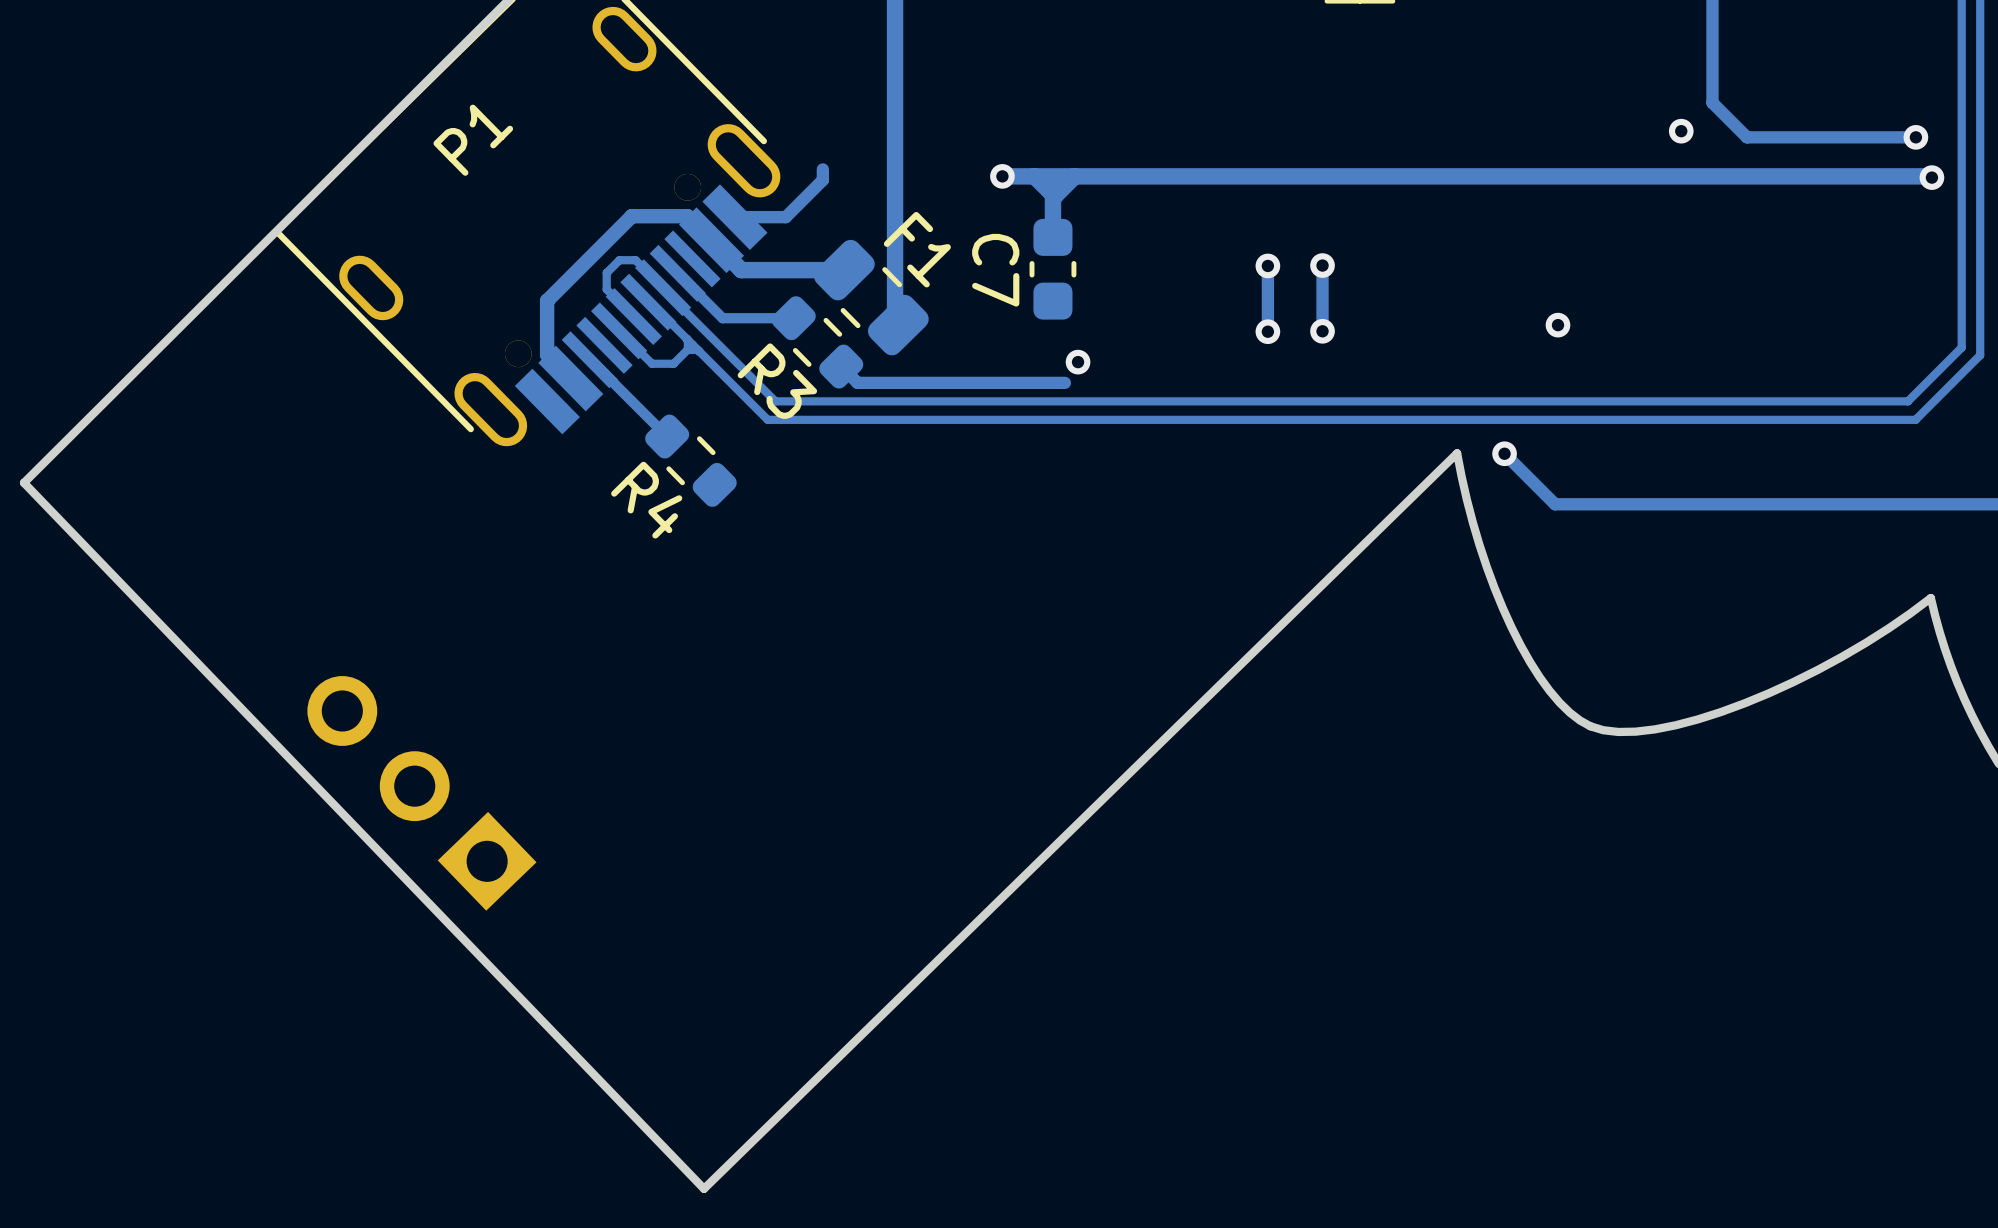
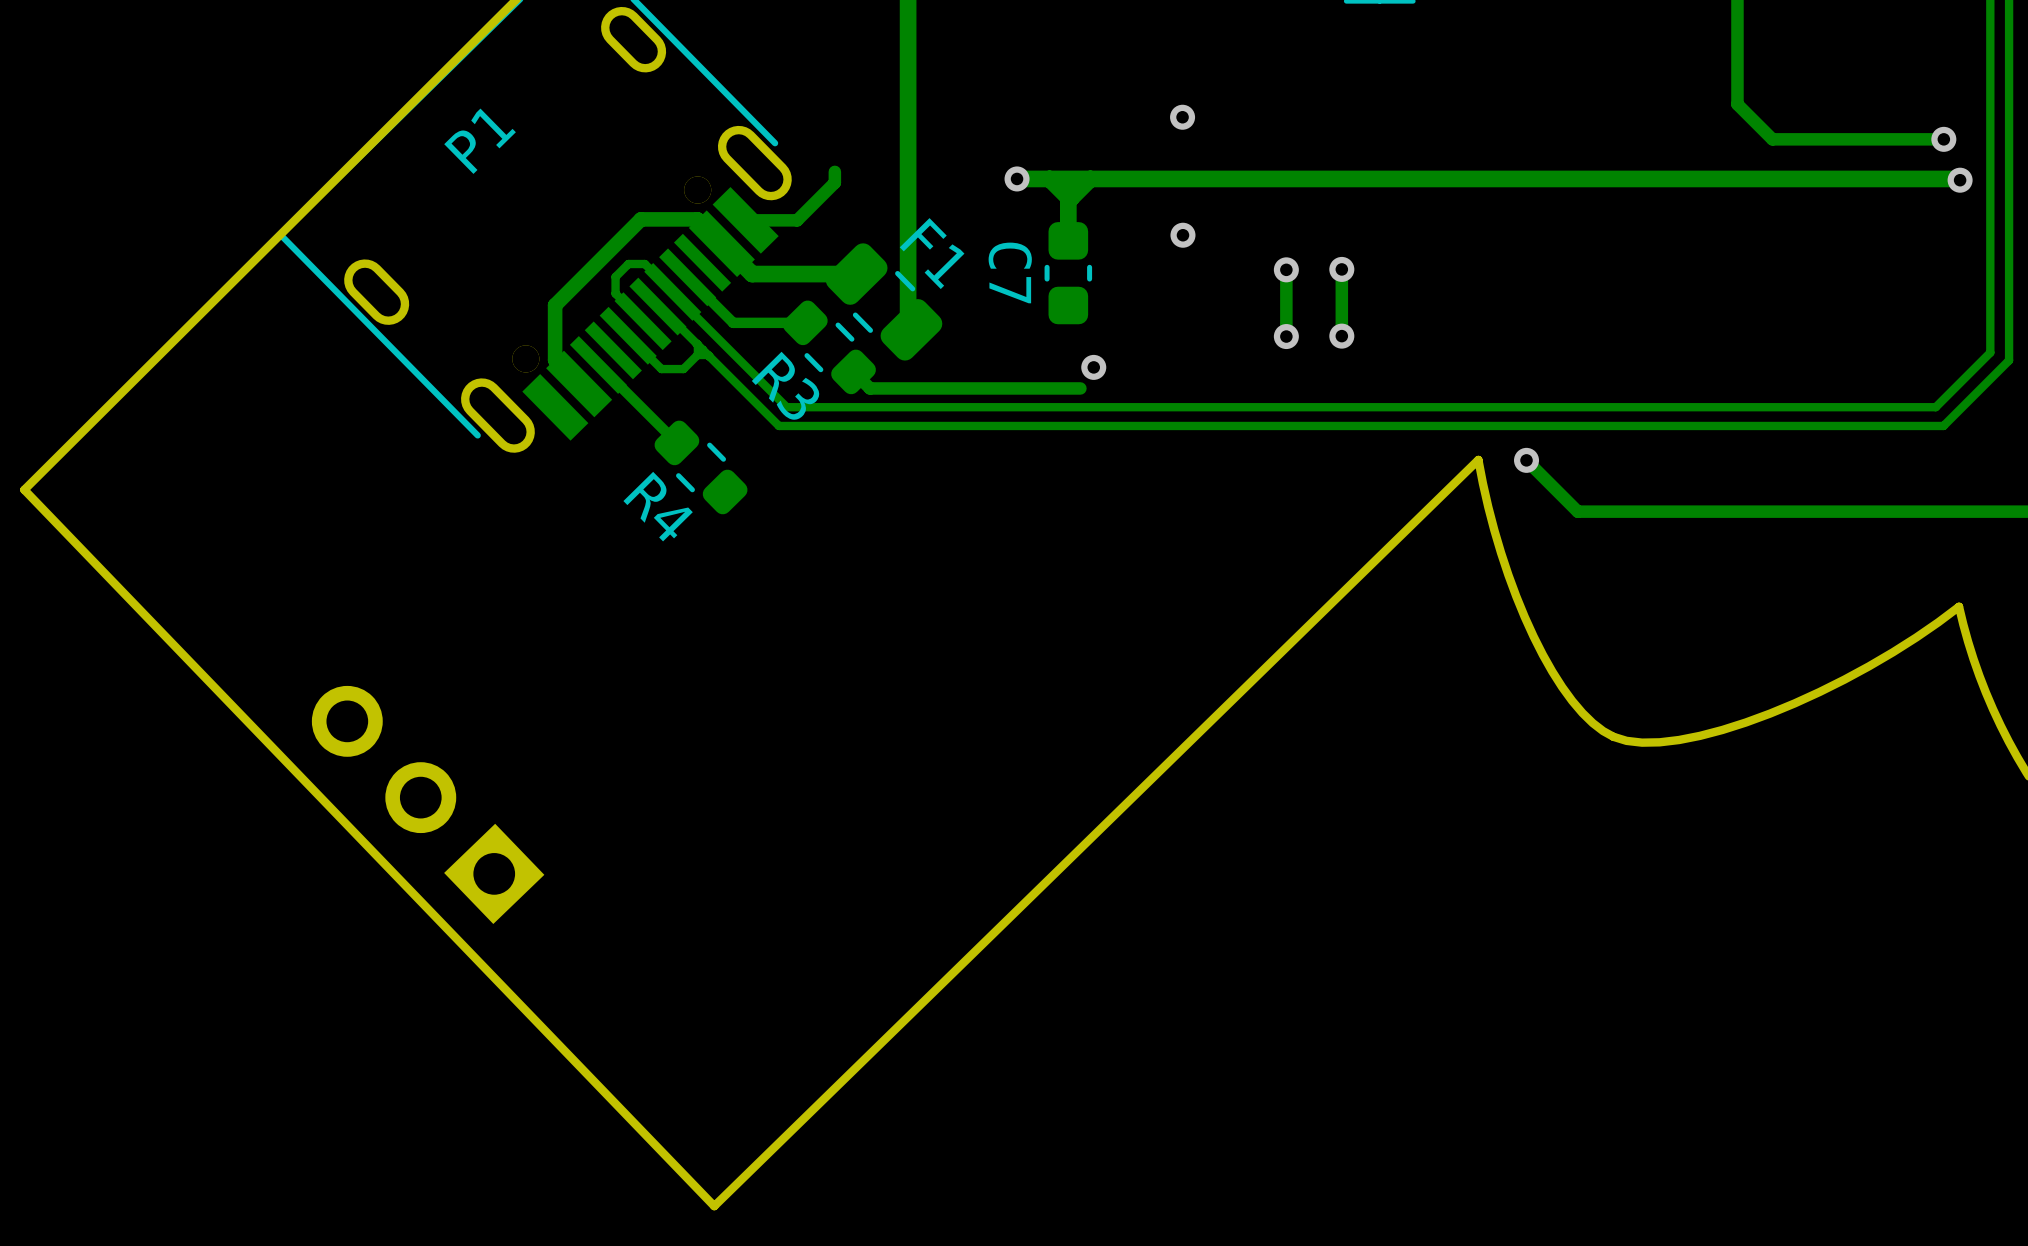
via: none -> (1182, 117)
via: (1681, 131) -> none
via: none -> (1182, 235)
via: (1557, 325) -> none

